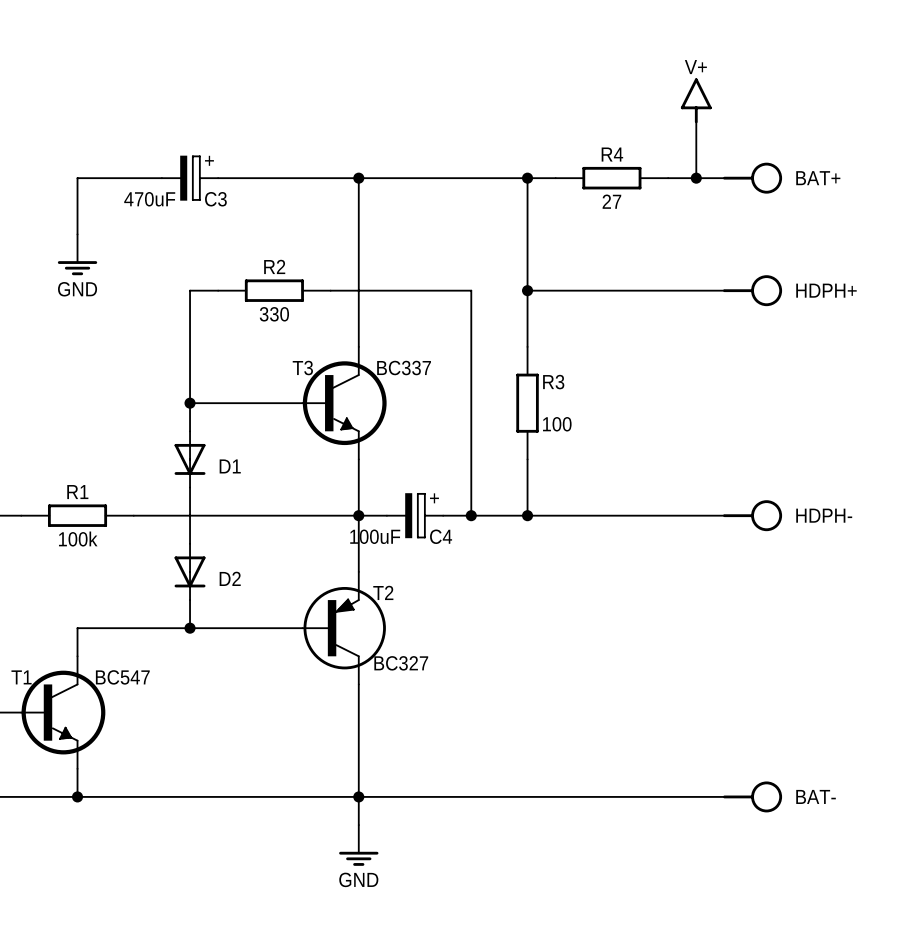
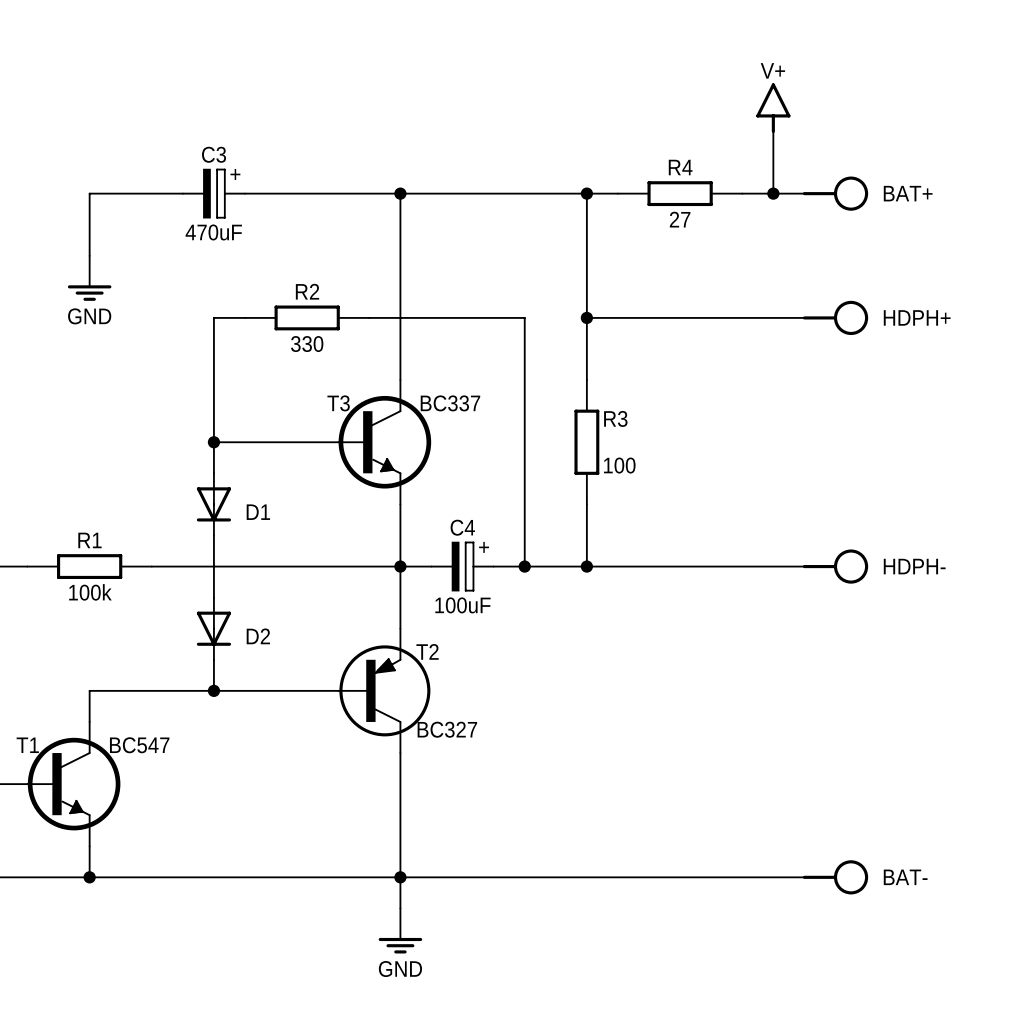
C3 value position: 470uF (149, 199) -> 470uF (213, 232)
C3 name position: C3 (215, 199) -> C3 (214, 154)
C4 value position: 100uF (375, 536) -> 100uF (462, 605)
C4 name position: C4 (441, 536) -> C4 (462, 527)

